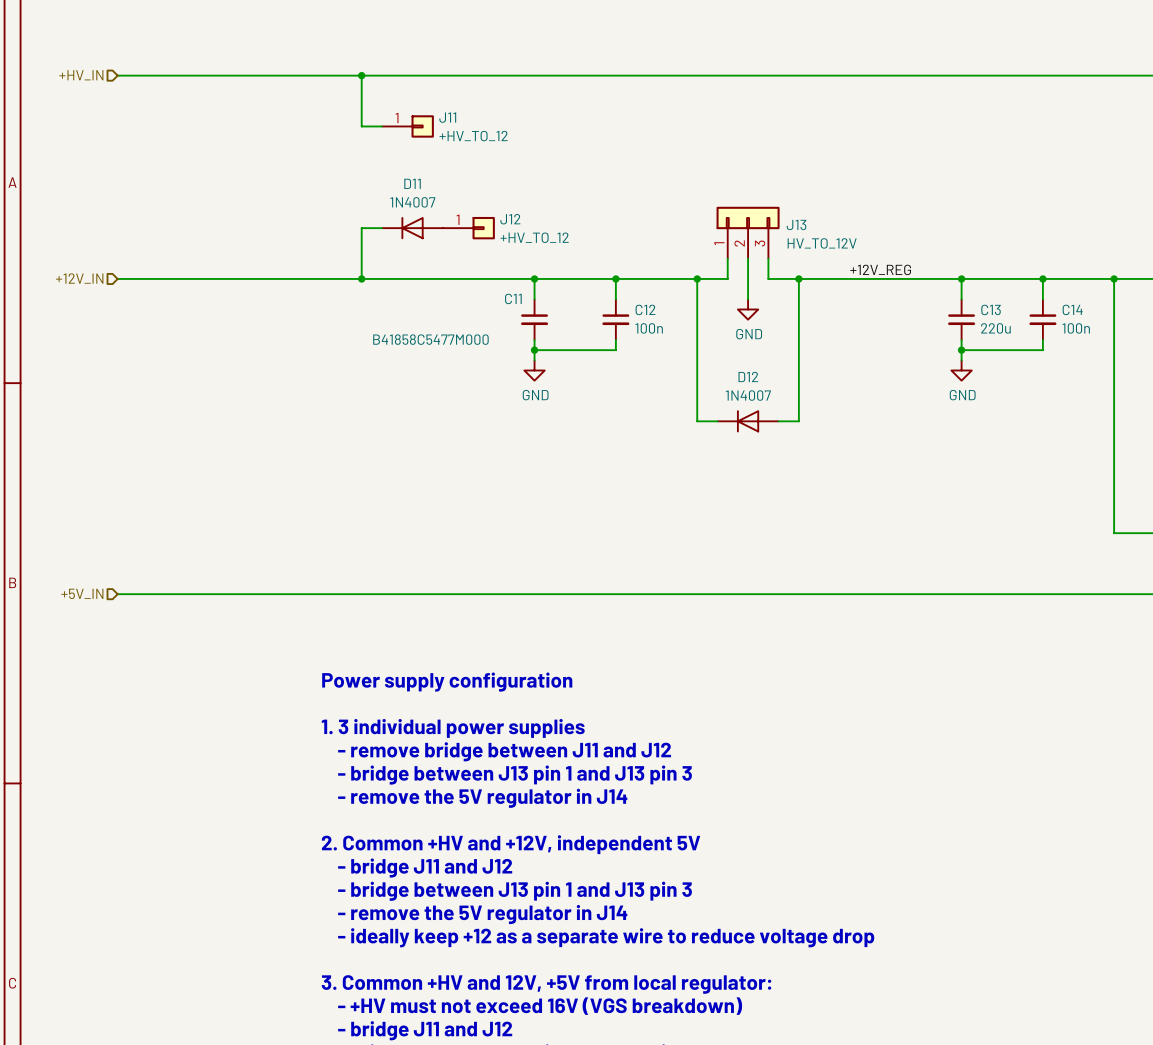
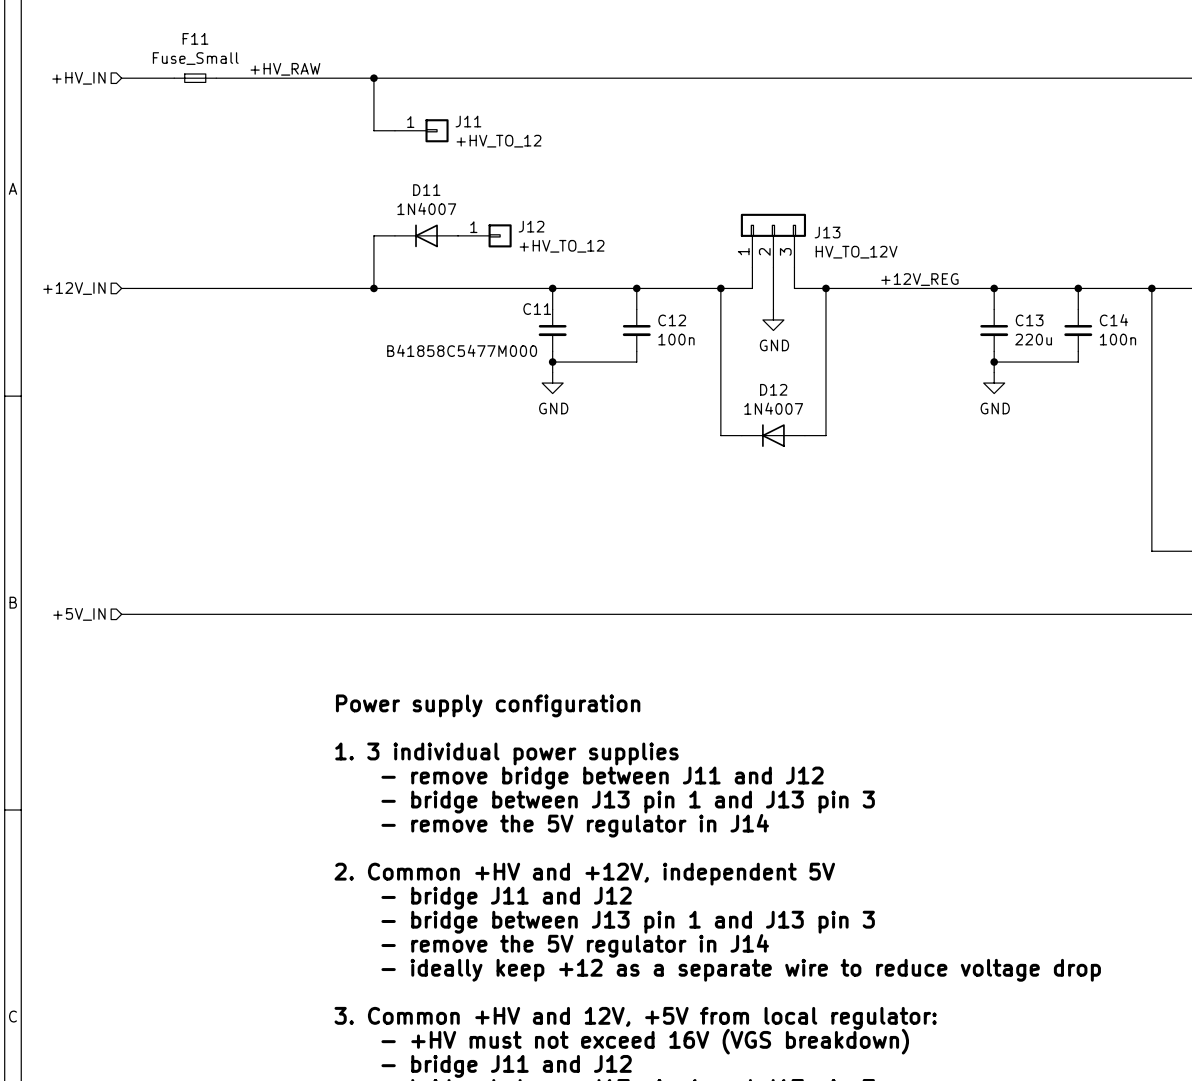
label: none -> +HV_RAW (285, 69)
F11: none -> Fuse_Small (195, 78)

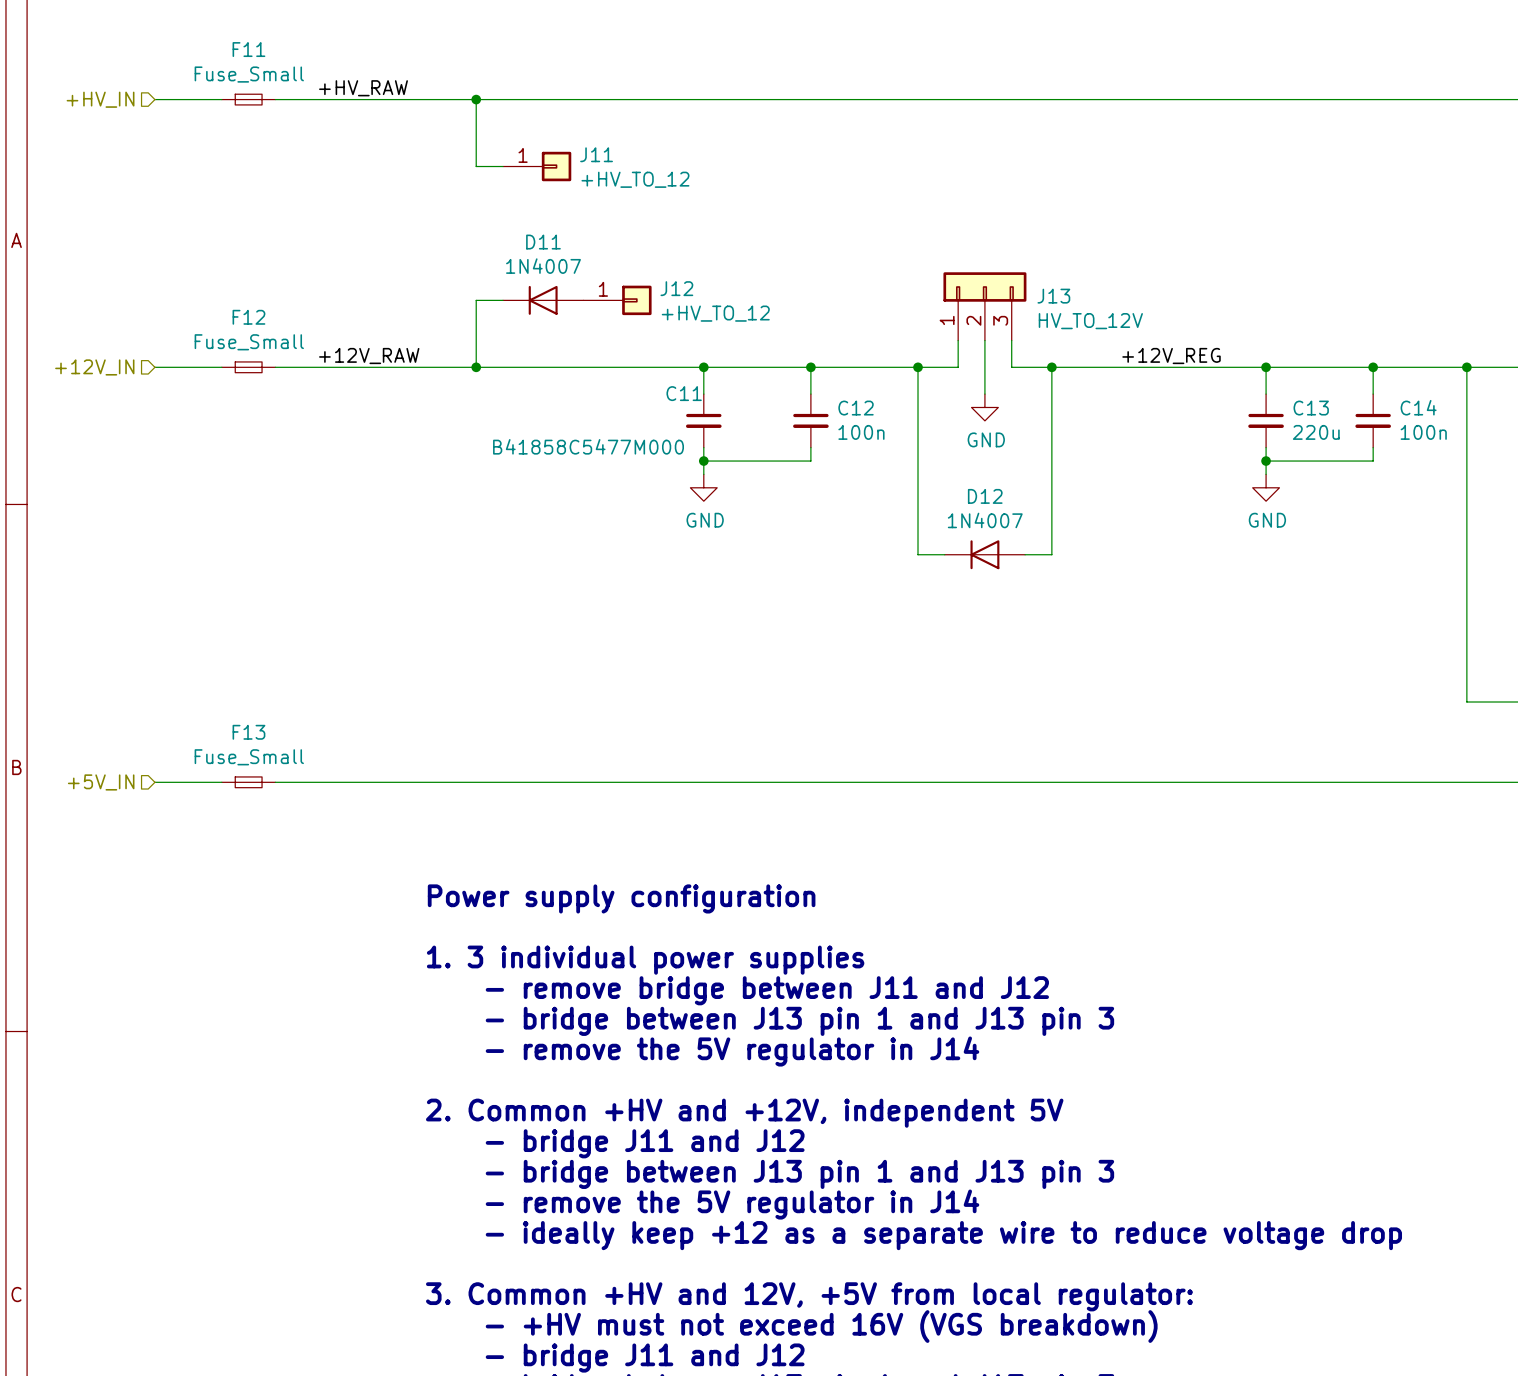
label: none -> +12V_RAW (369, 356)
F12: none -> Fuse_Small (248, 367)
F13: none -> Fuse_Small (248, 782)

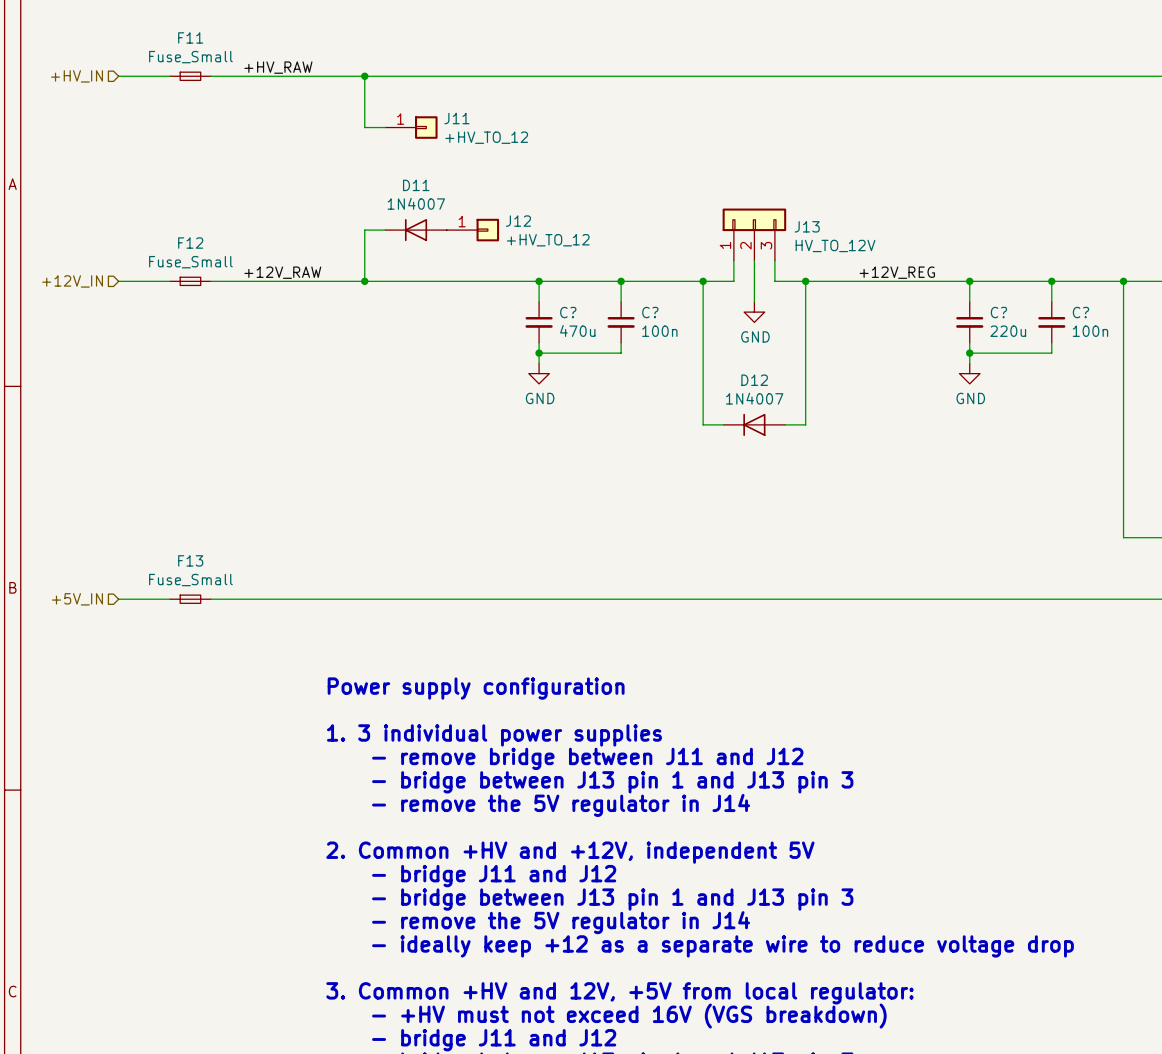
C11 name: C11 (684, 393) -> C? (568, 312)
C14 name: C14 (1418, 407) -> C? (1080, 312)
C12 name: C12 (856, 408) -> C? (650, 312)
C13 name: C13 (1311, 408) -> C? (998, 312)
C11 value: B41858C5477M000 (588, 446) -> 470u (577, 330)

